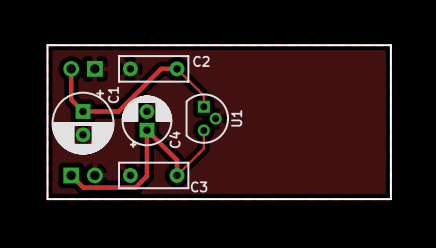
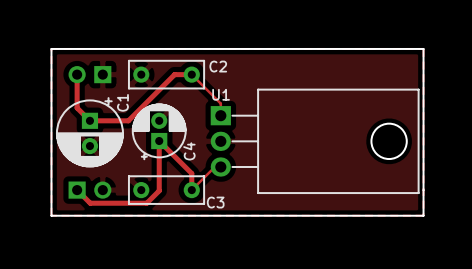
U1 footprint: [186, 93, 229, 144] -> [210, 89, 420, 194]
U1 name position: U1 (236, 118) -> U1 (221, 94)
track: (203, 130) (203, 148) -> none

